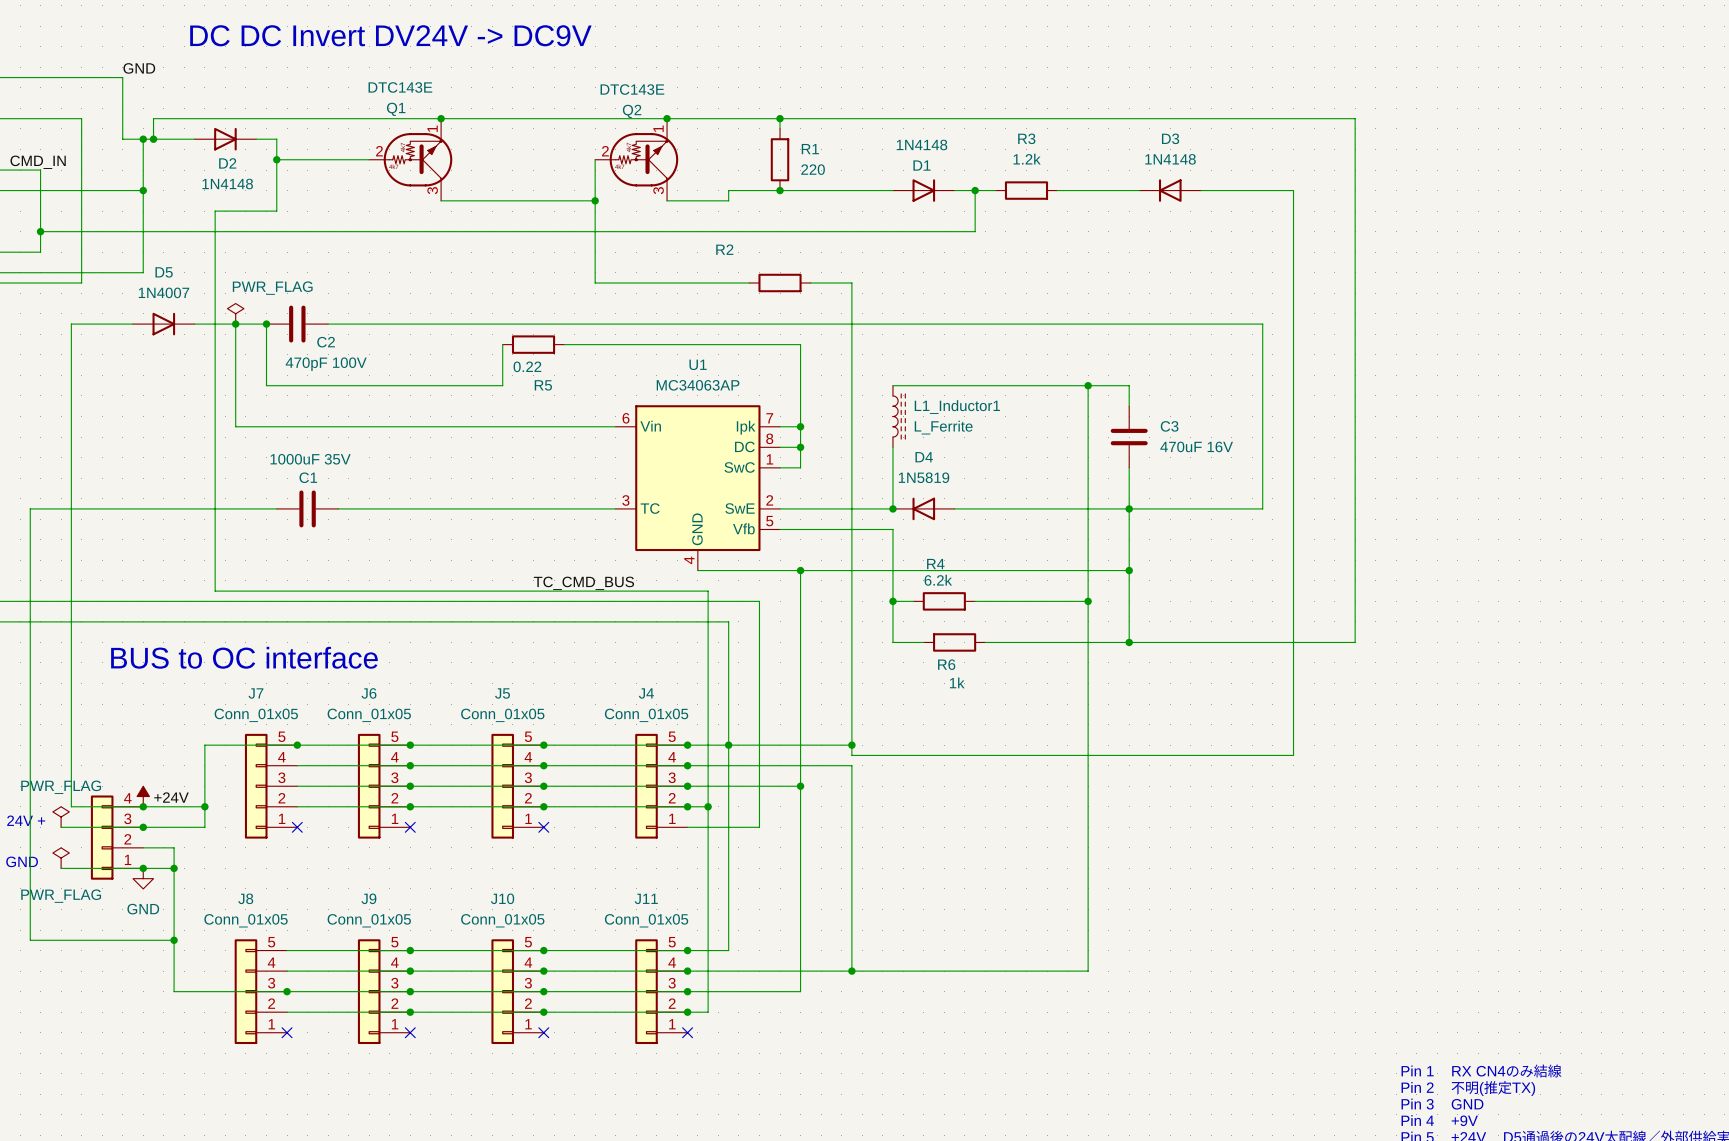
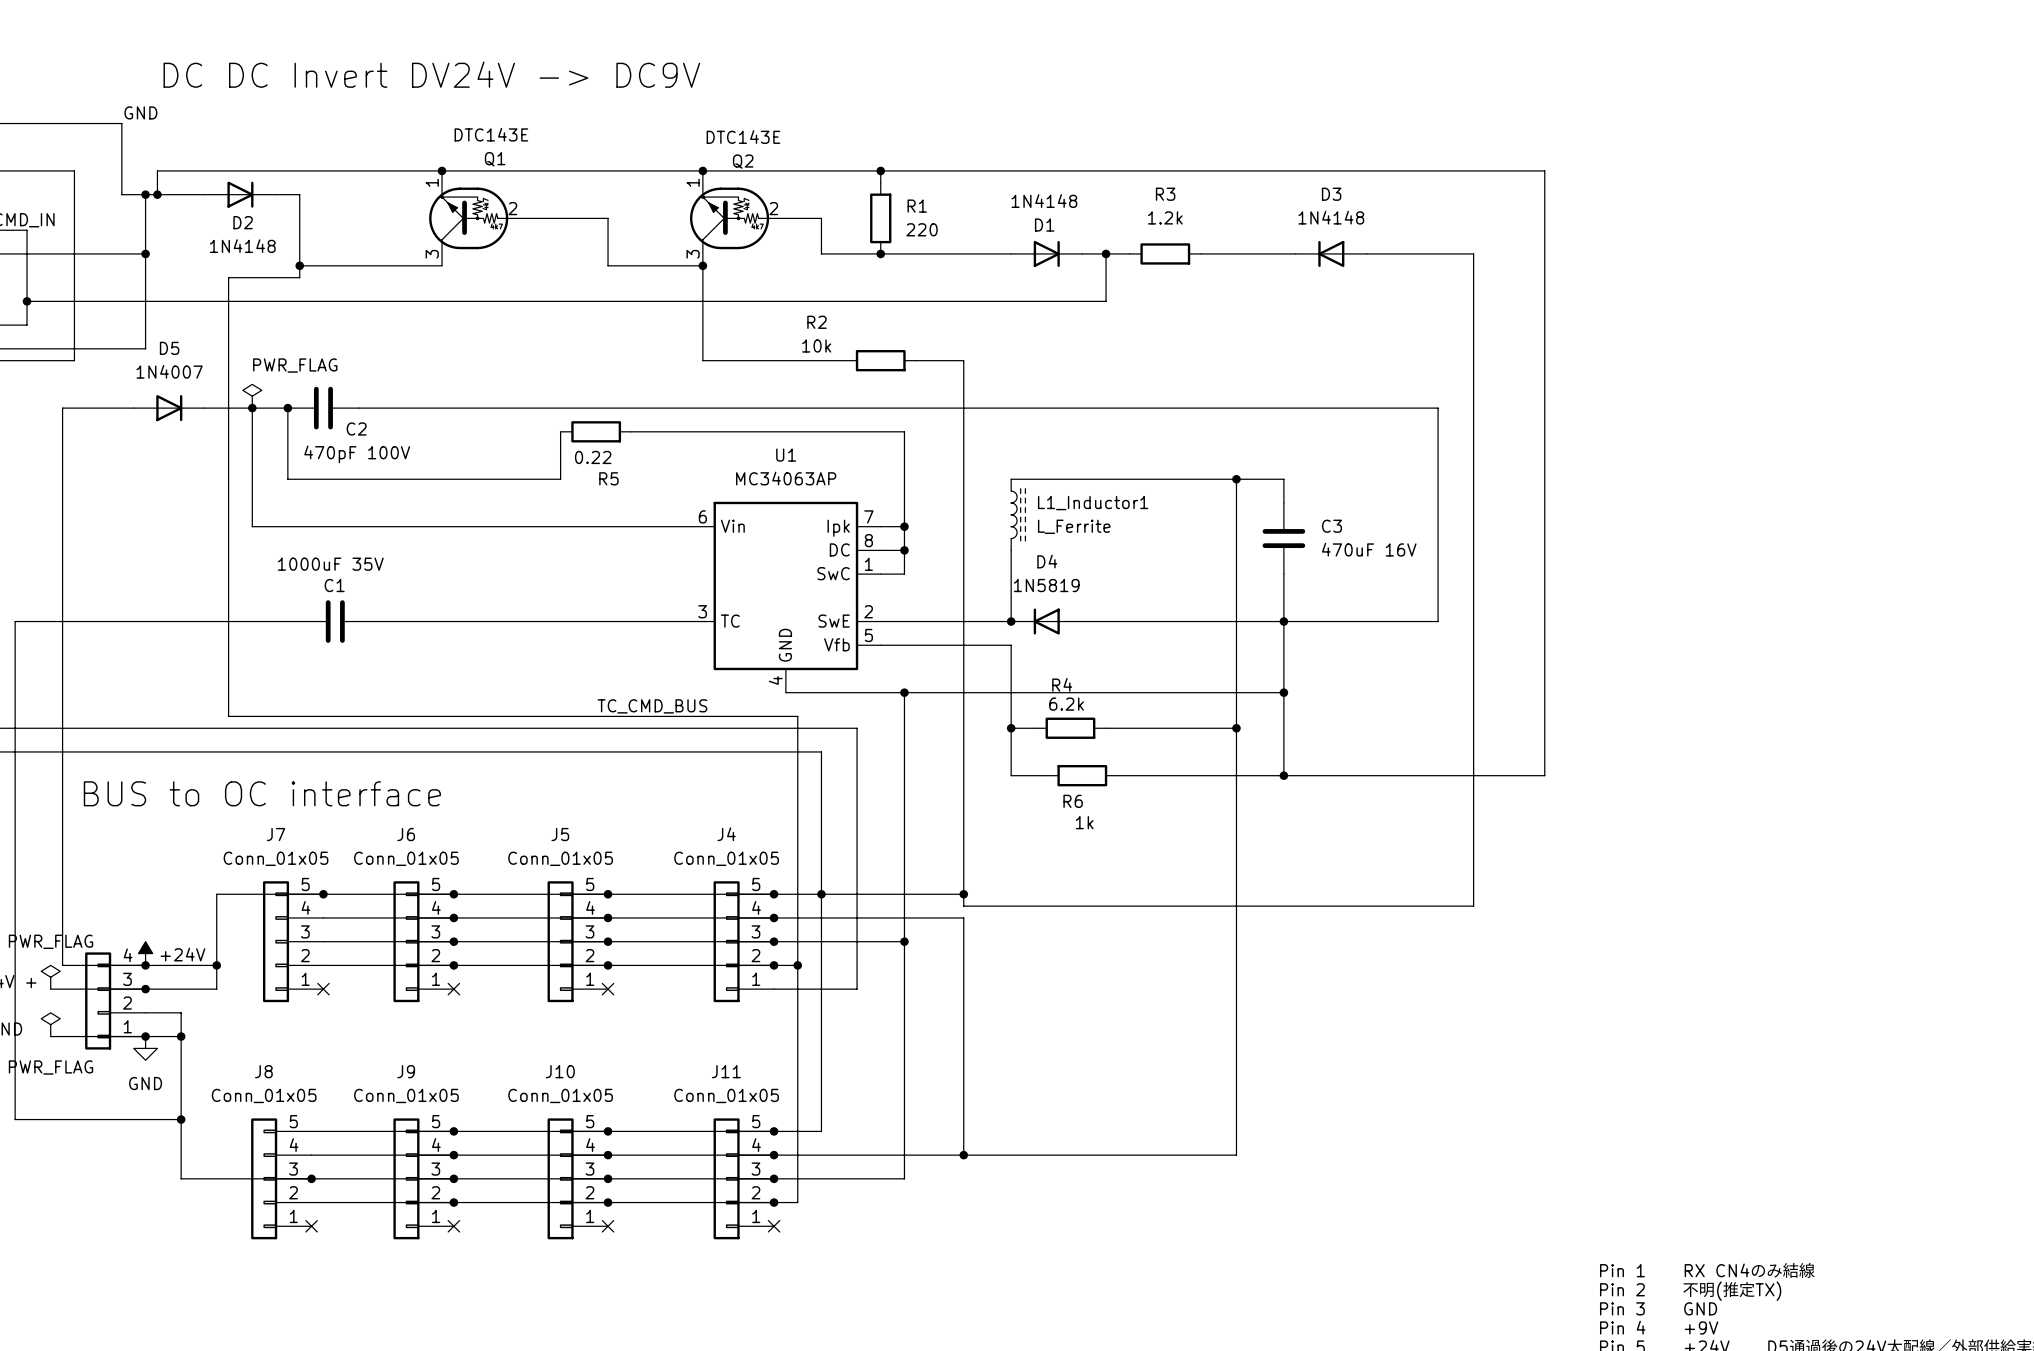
junction position: (441, 118) -> (442, 170)
junction position: (667, 118) -> (702, 170)
wire: (276, 159) (369, 159) -> none
junction position: (276, 159) -> (299, 265)
Q1 flip: as is (417, 159) -> left-right (468, 218)
wire: (595, 159) (595, 282) (625, 282) -> (667, 265) (702, 265) (702, 360)
Q2 flip: as is (643, 159) -> left-right (729, 218)
wire: (728, 190) (728, 200) (667, 200) -> (821, 253) (821, 218) (785, 218)
wire: none -> (299, 265) (442, 265)
wire: (441, 200) (543, 200) -> (525, 218) (608, 218) (608, 265)
junction position: (595, 200) -> (702, 265)
R2 value: none -> 10k (816, 346)

